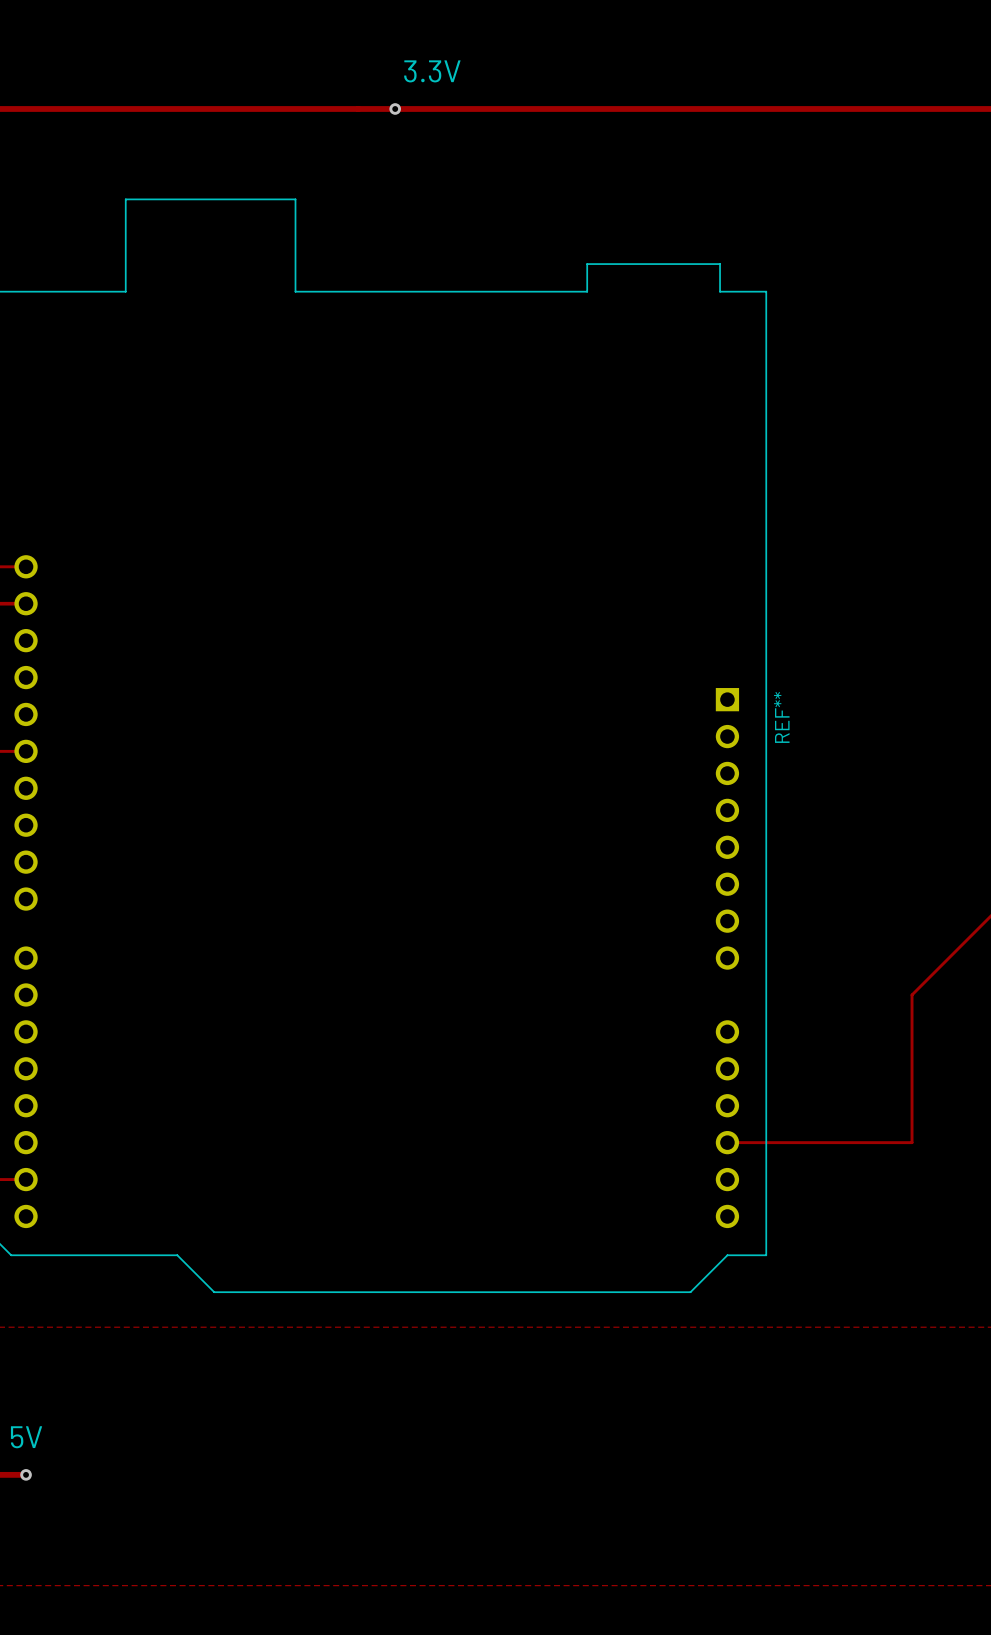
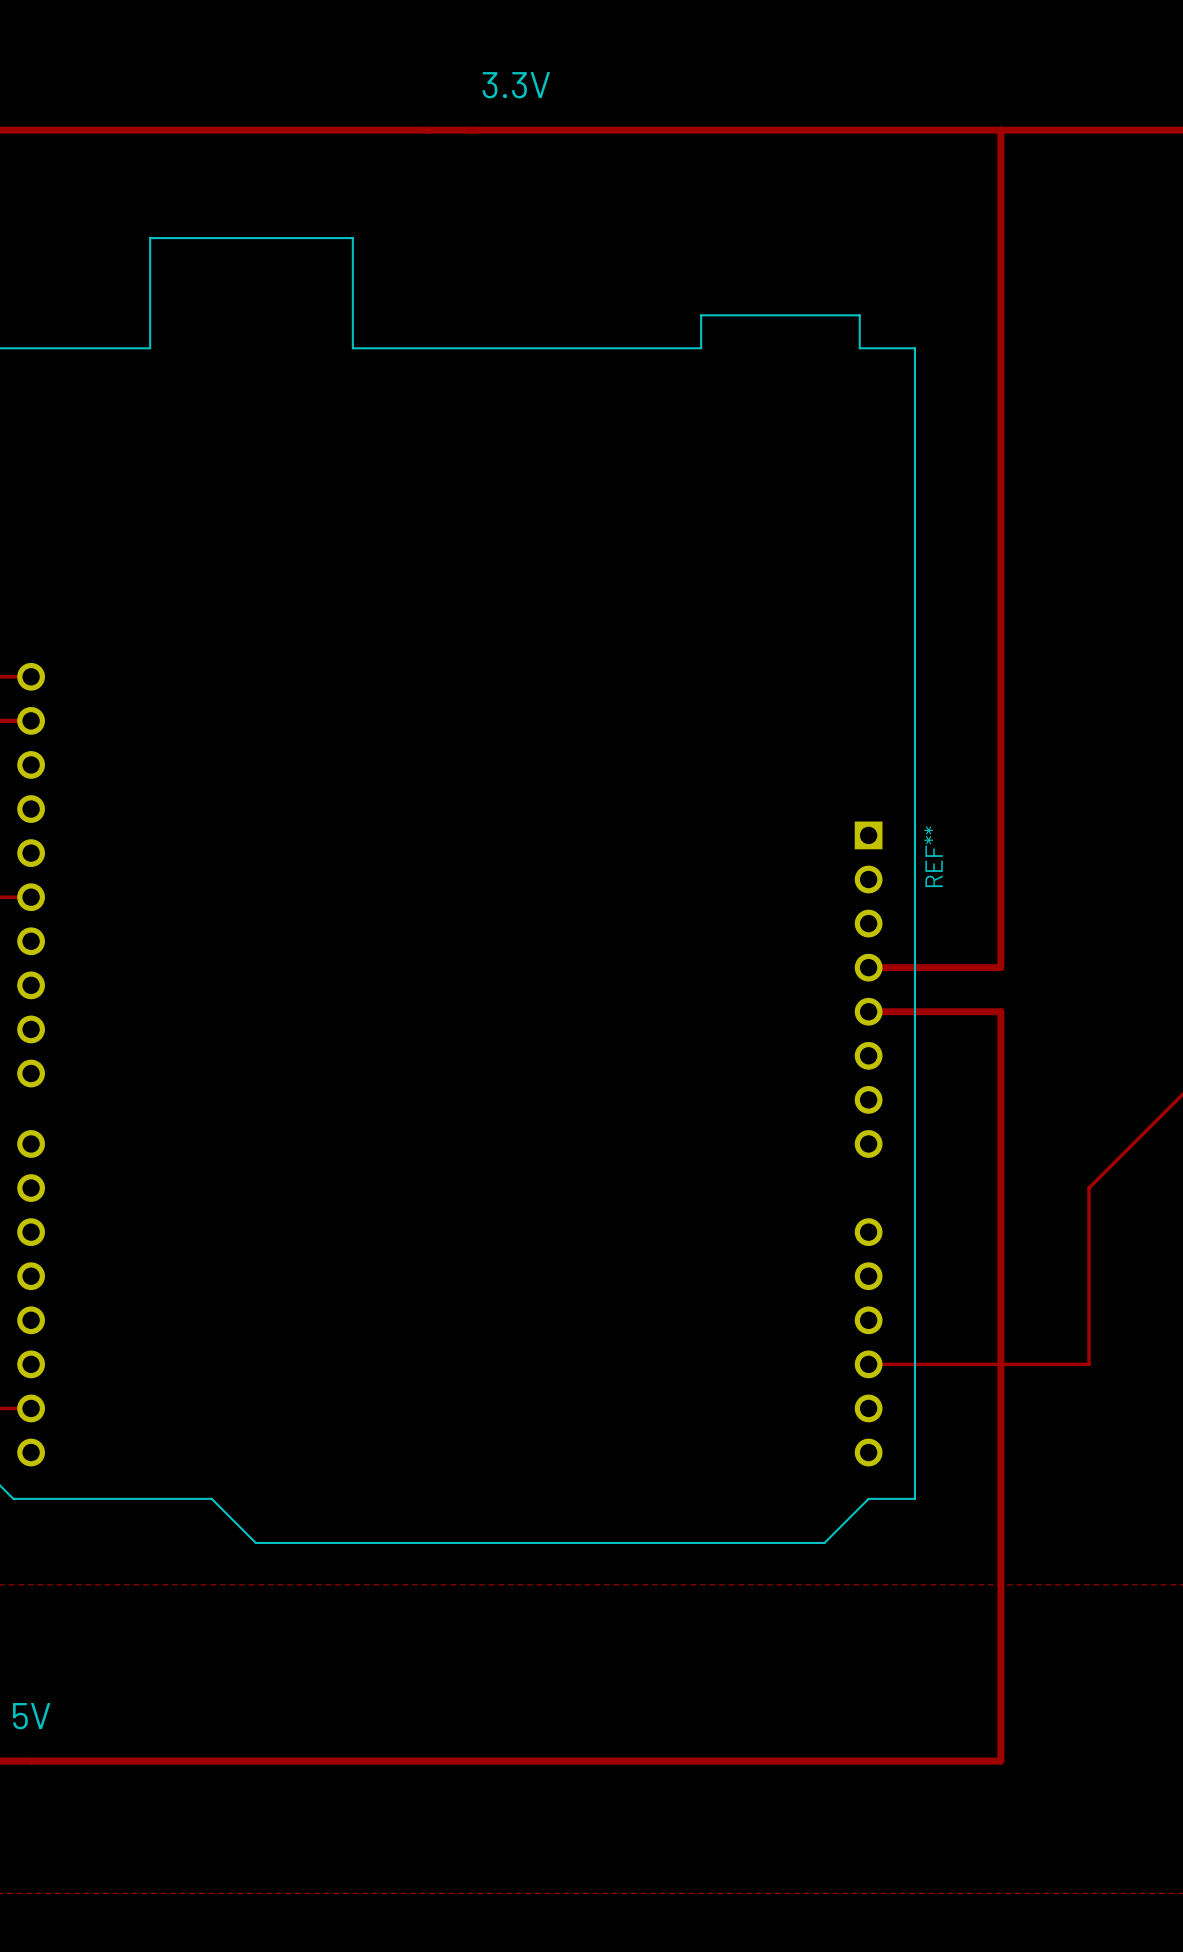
via: (395, 108) -> none
track: none -> (1000, 130) (1000, 967) (868, 967)
track: none -> (868, 1011) (1000, 1011) (1000, 1761) (31, 1761)
via: (26, 1474) -> none

